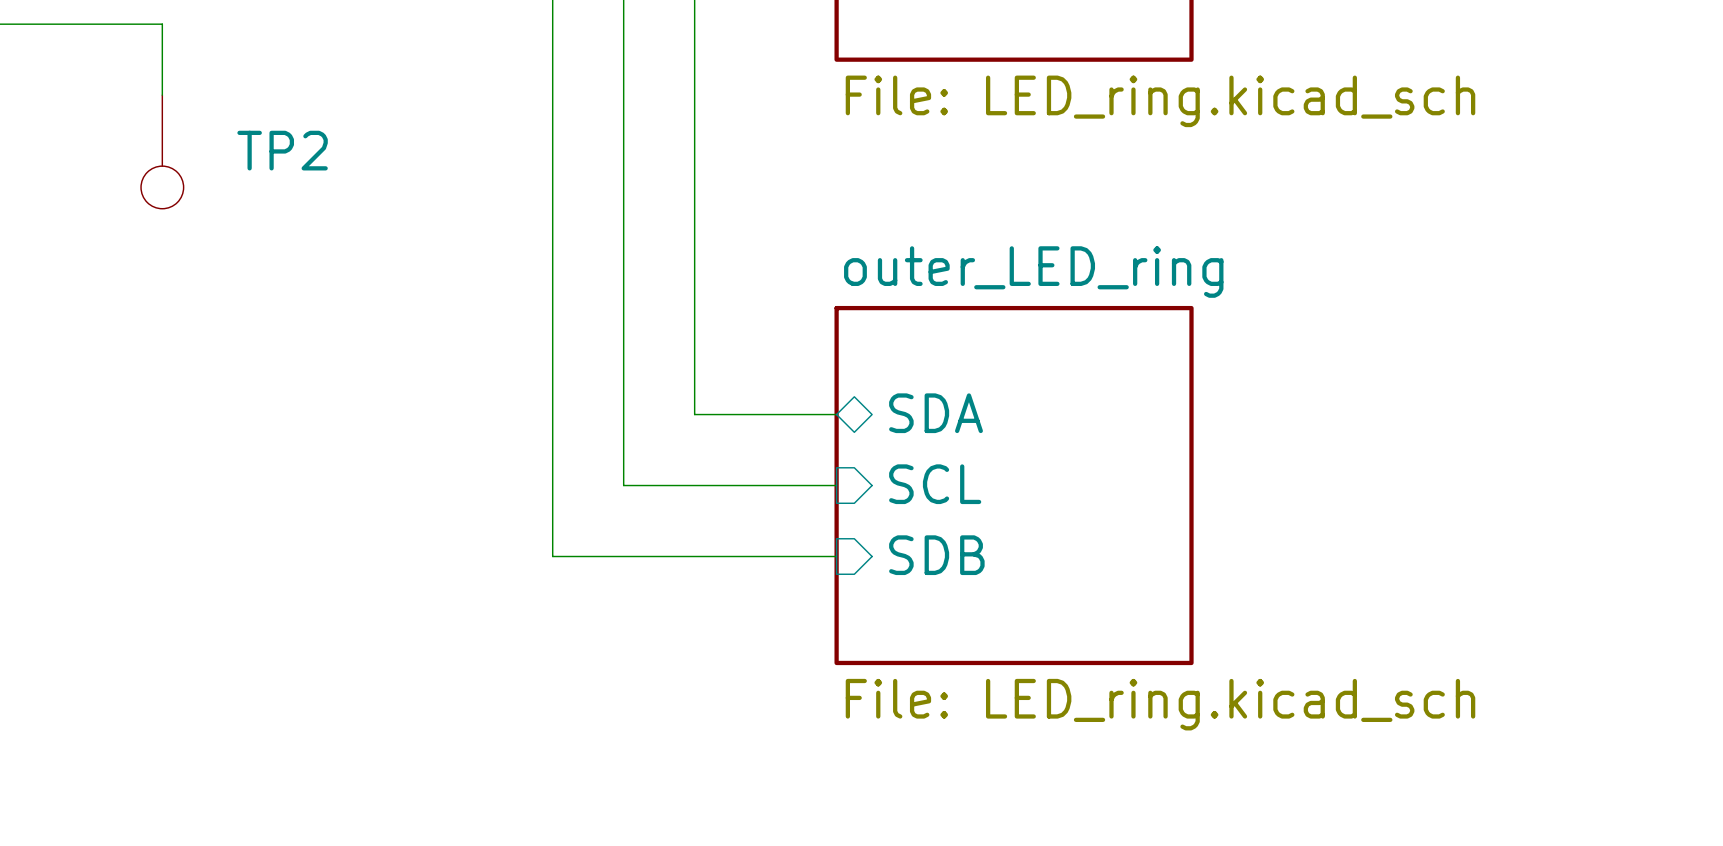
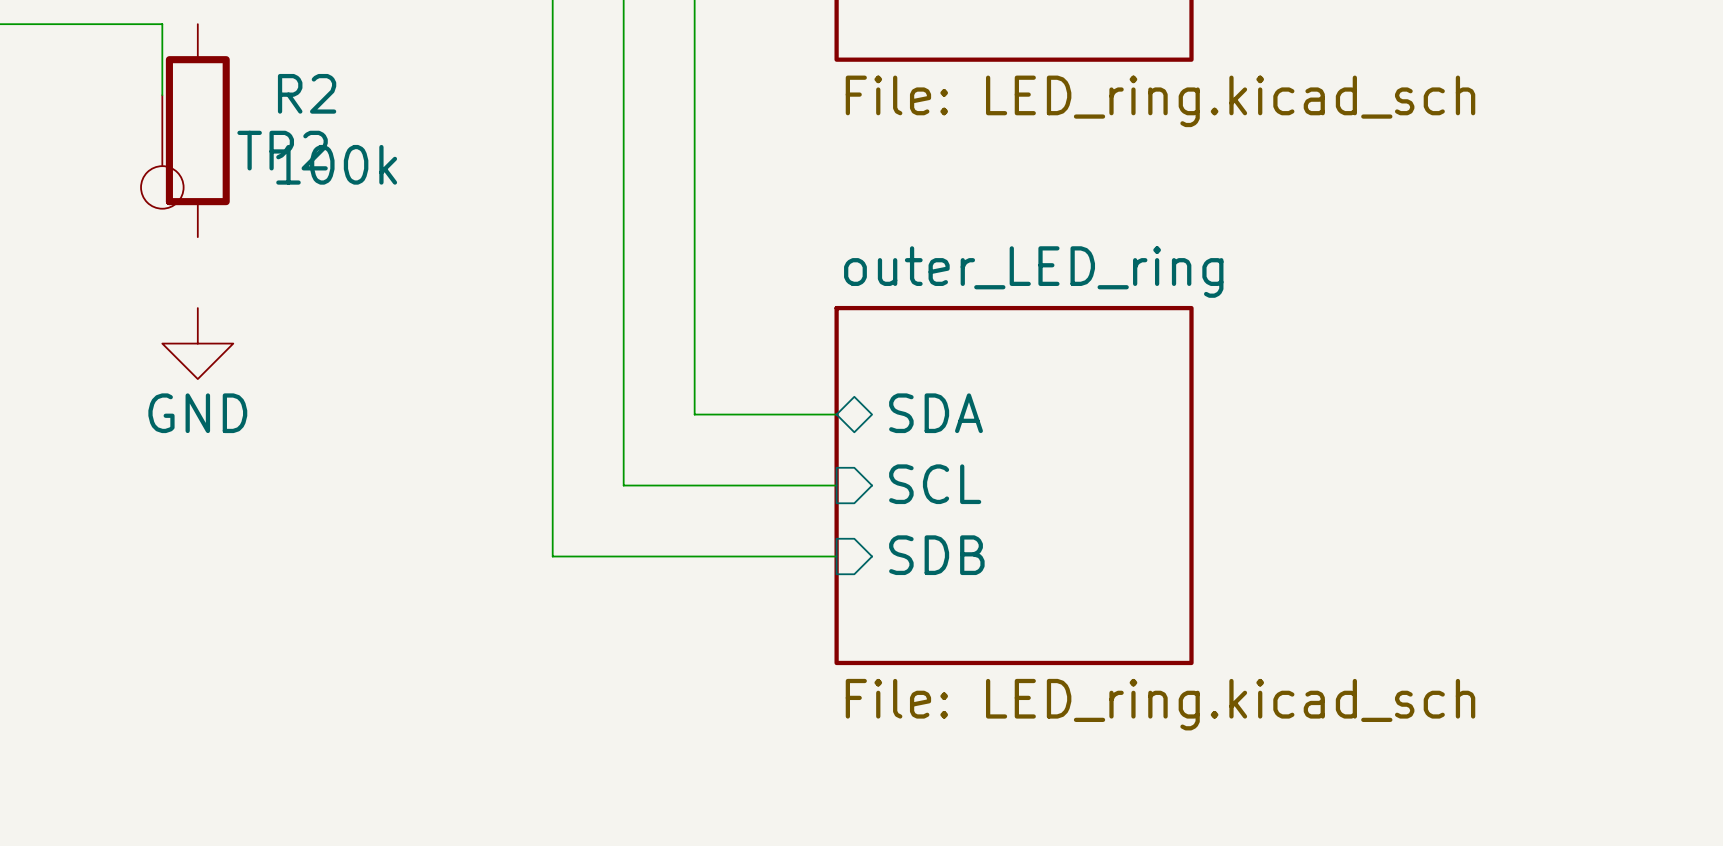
R2: none -> 100k (197, 130)
power symbol: none -> GND (197, 343)

